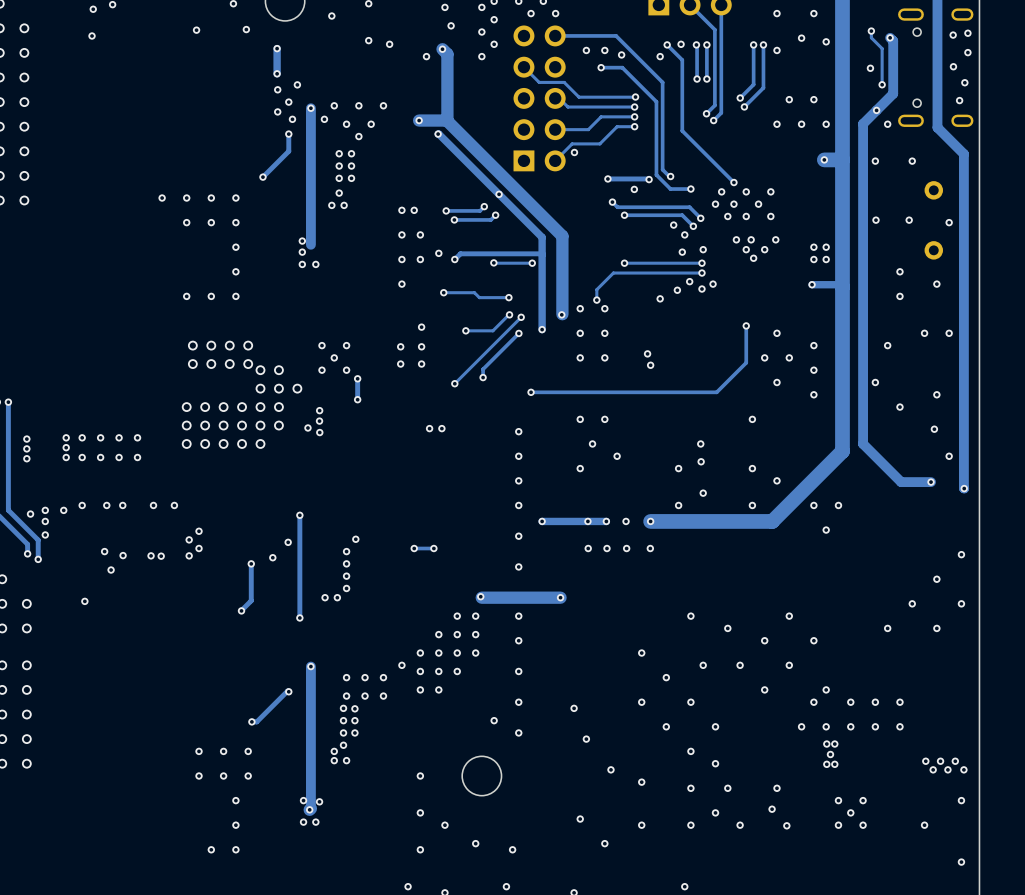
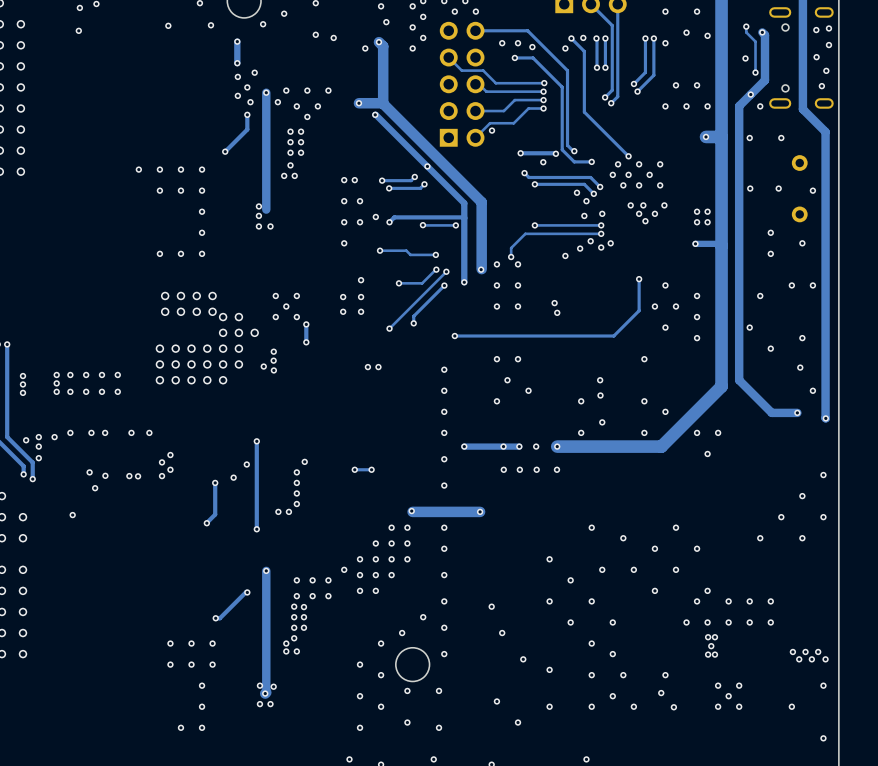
via: none -> (263, 24)
via: none -> (402, 633)
via: none -> (381, 643)
via: none -> (444, 654)
via: none -> (381, 675)
via: none -> (407, 690)
via: none -> (439, 690)

